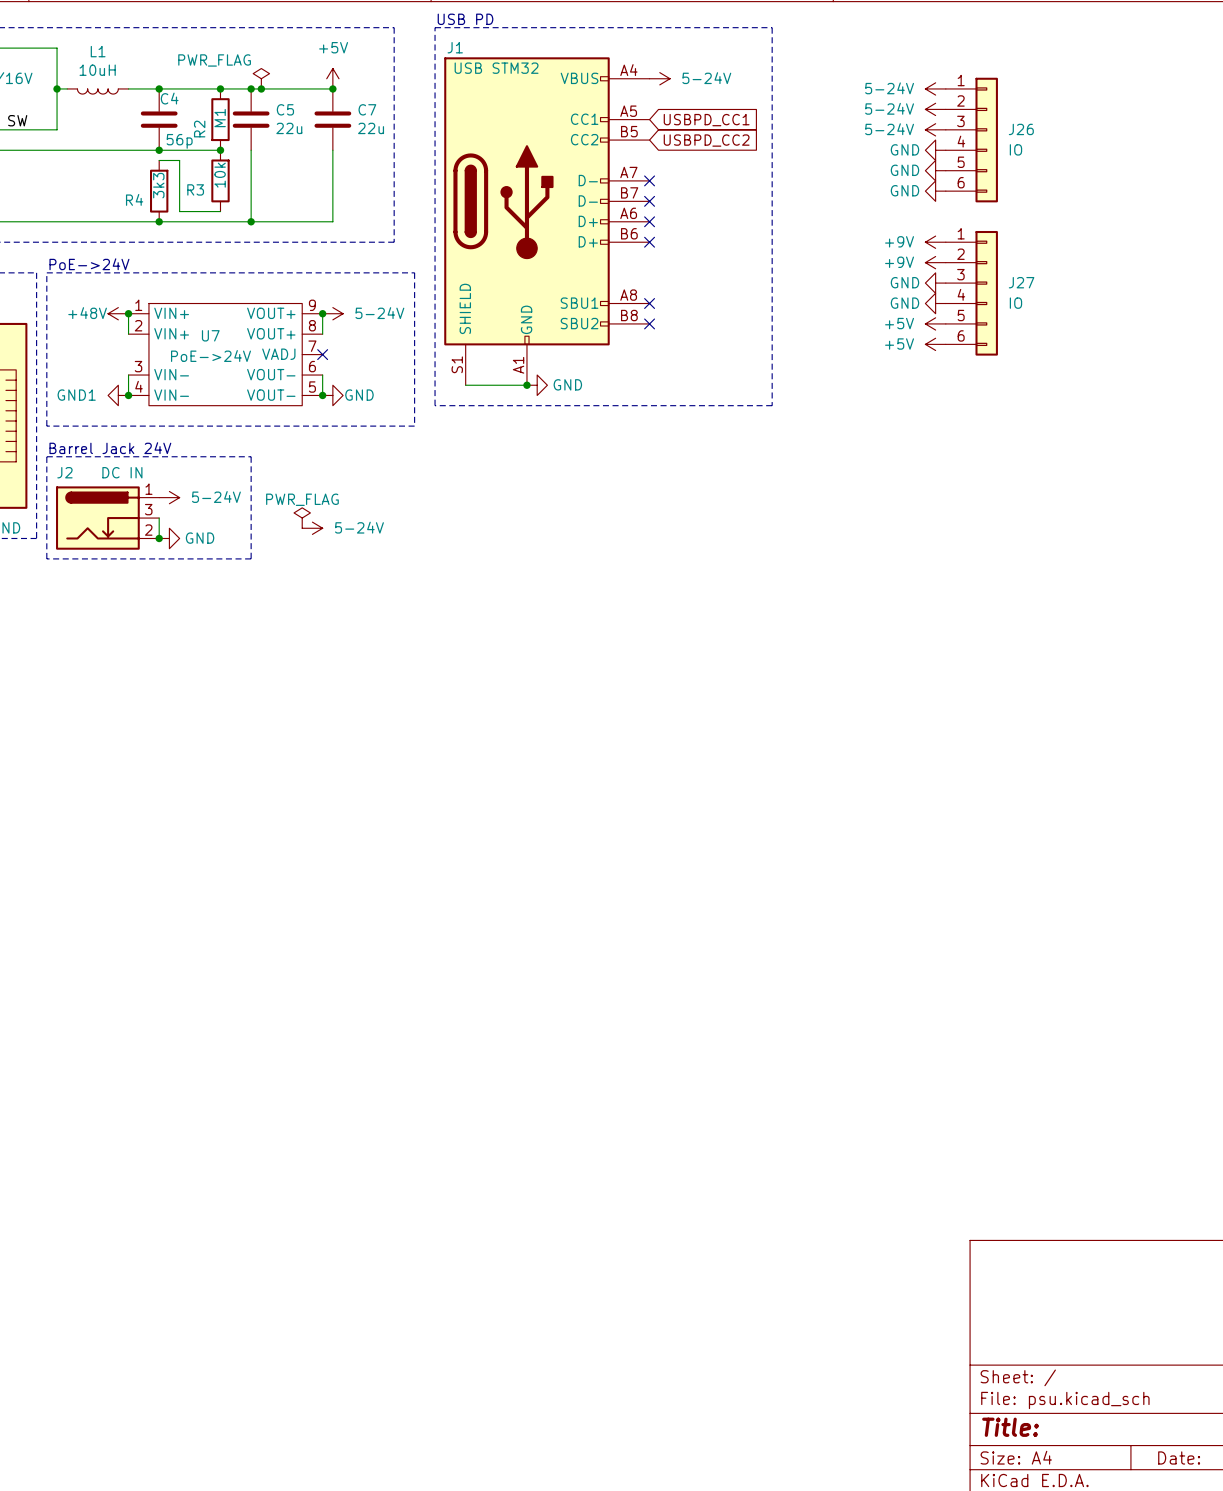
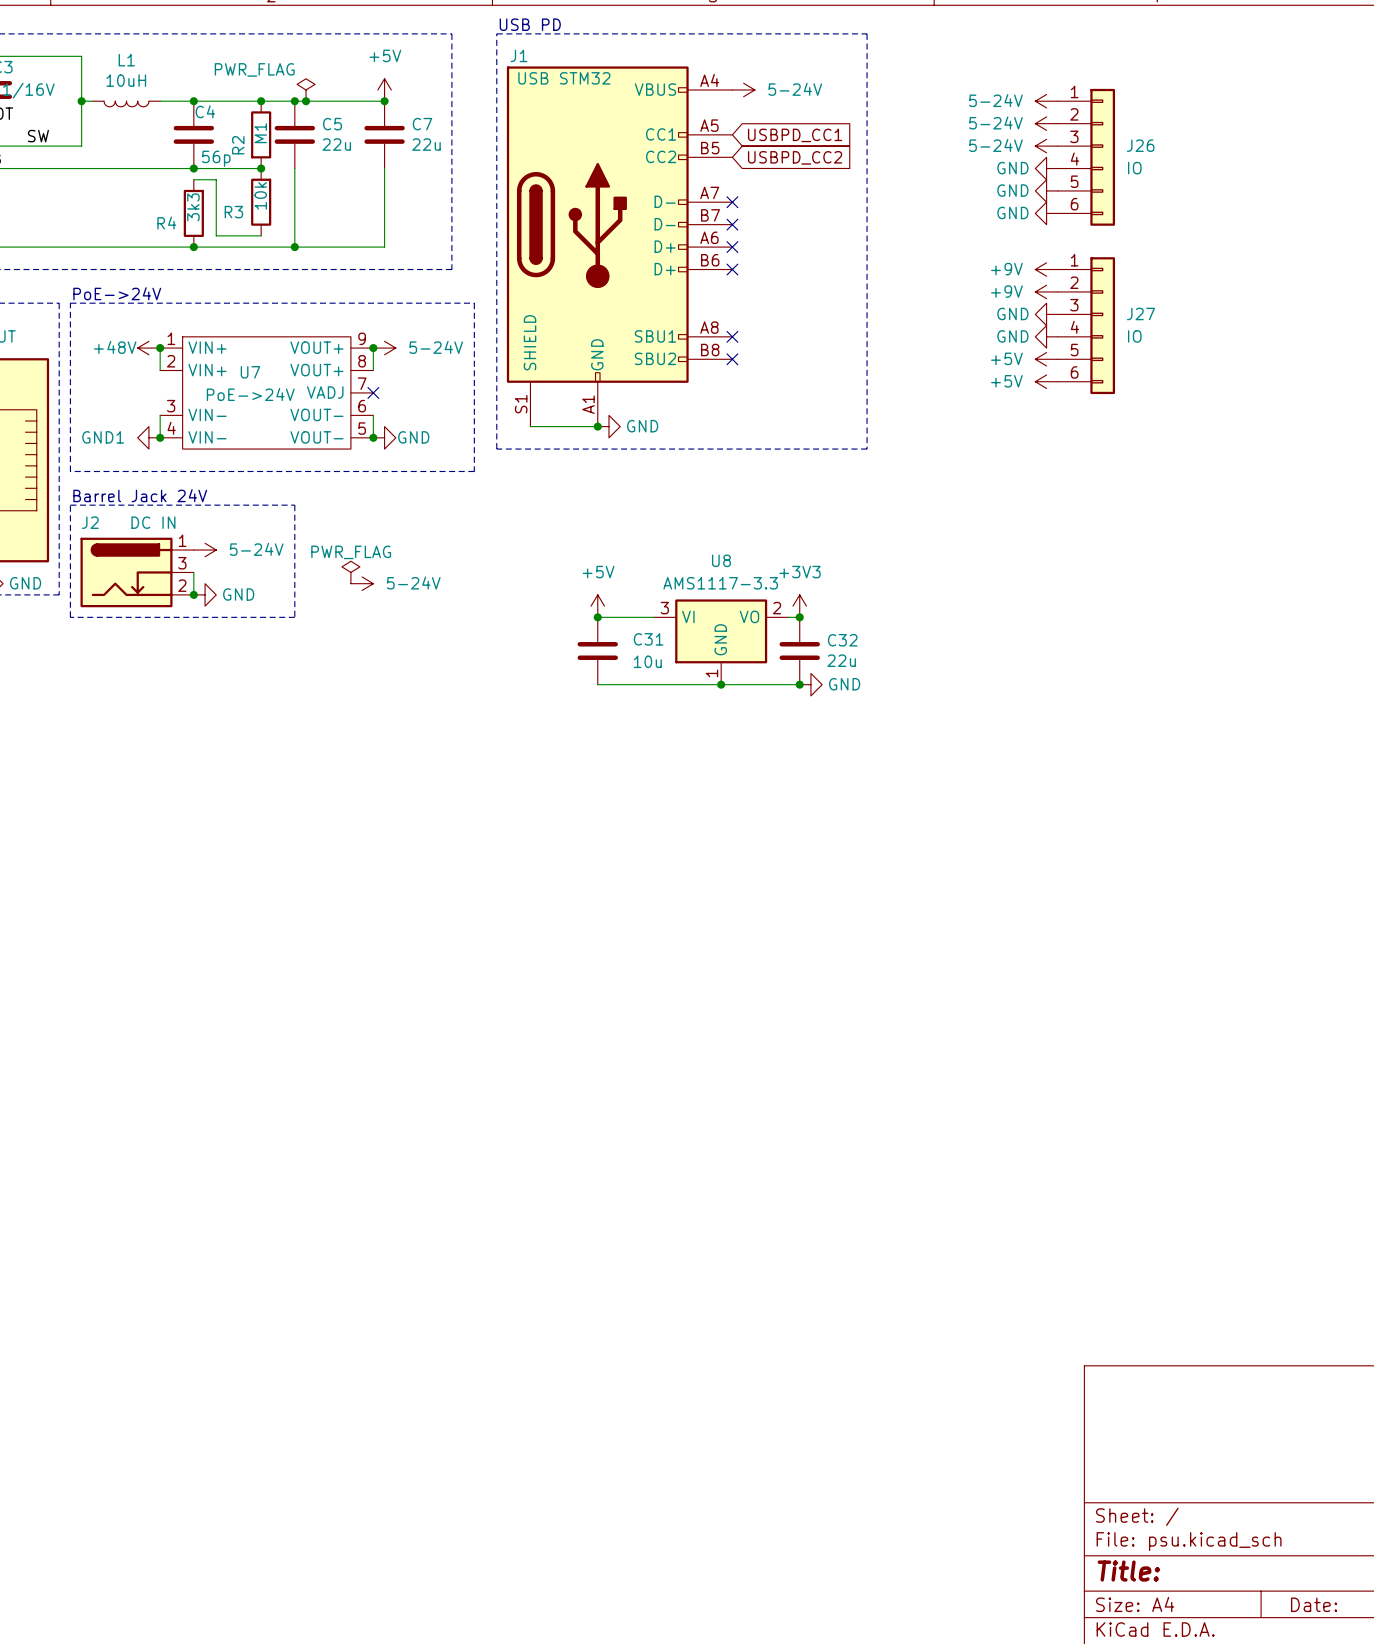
power symbol: none -> +5V (597, 606)
power symbol: none -> +3V3 (799, 606)
wire: none -> (597, 617) (653, 617)
junction: none -> (597, 617)
wire: none -> (788, 617) (799, 617)
junction: none -> (799, 617)
U8: none -> AMS1117-3.3 (721, 642)
C31: none -> 10u (597, 651)
C32: none -> 22u (799, 651)
wire: none -> (597, 684) (799, 684)
junction: none -> (721, 684)
junction: none -> (799, 684)
power symbol: none -> GND (810, 684)

